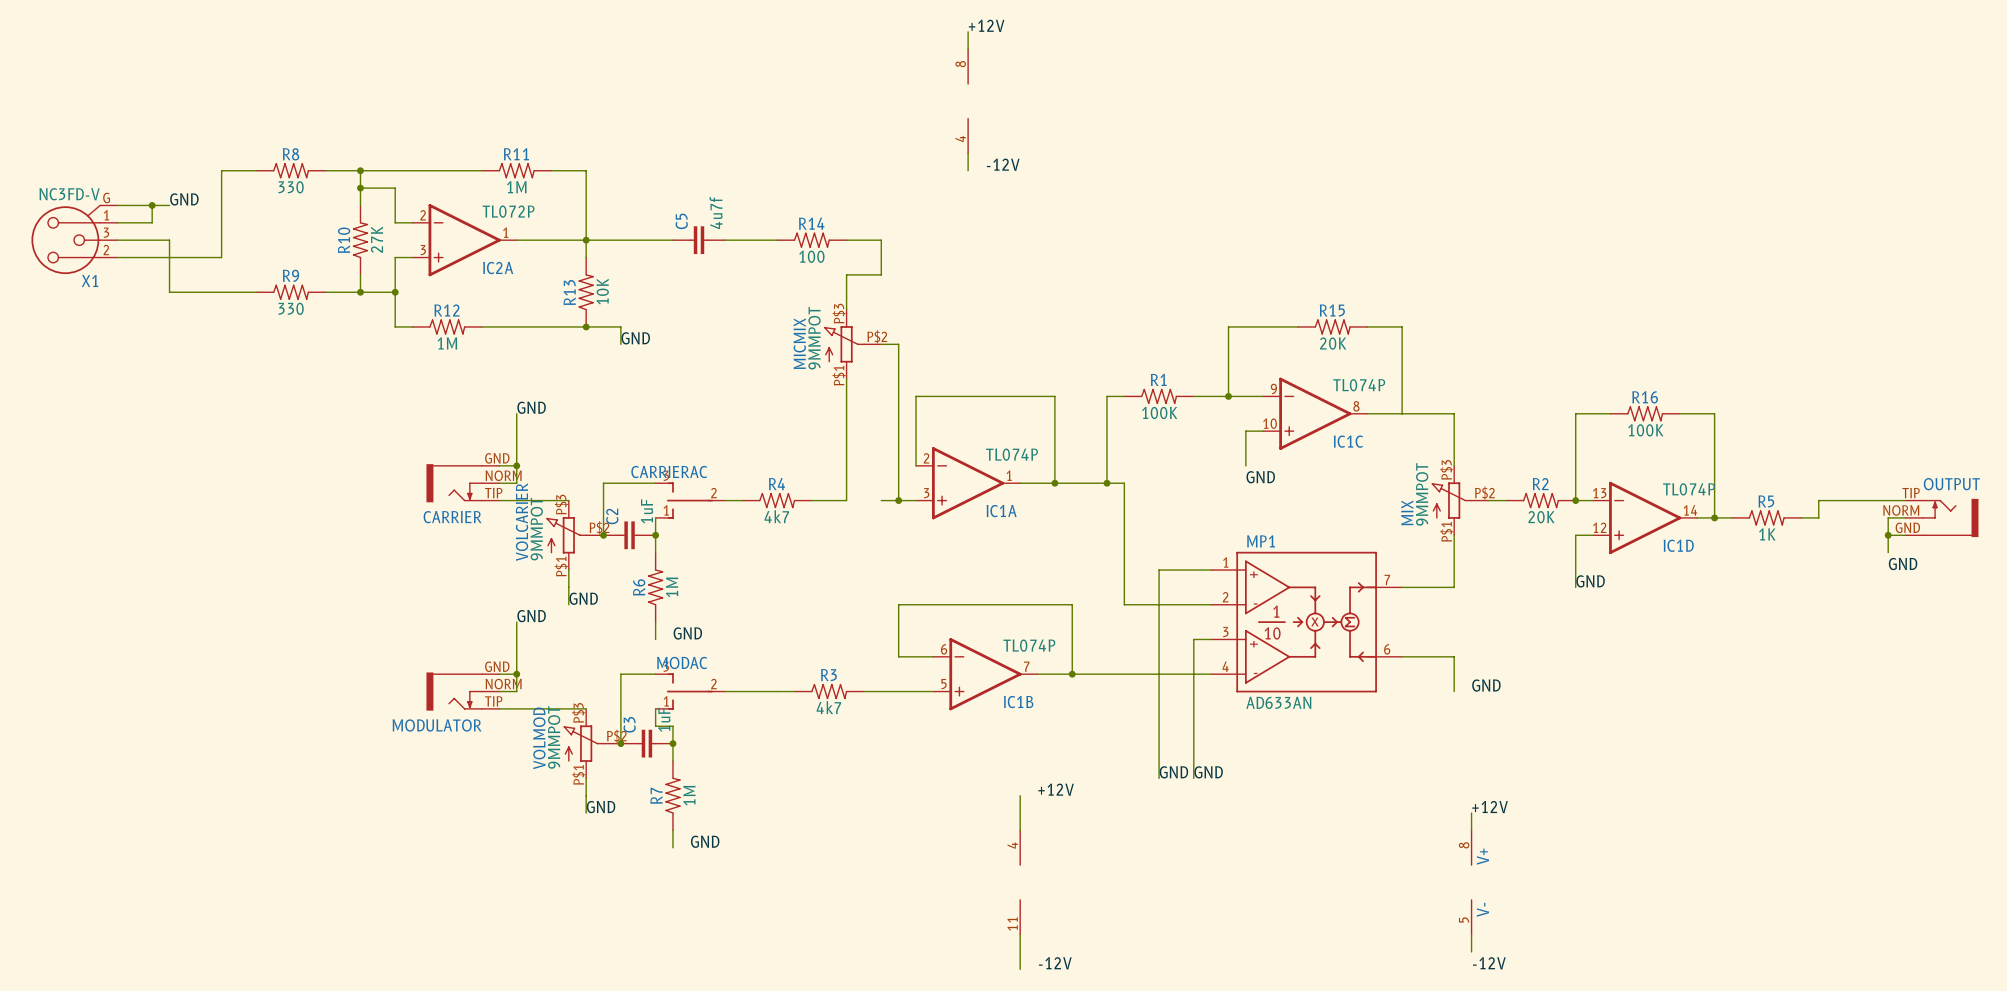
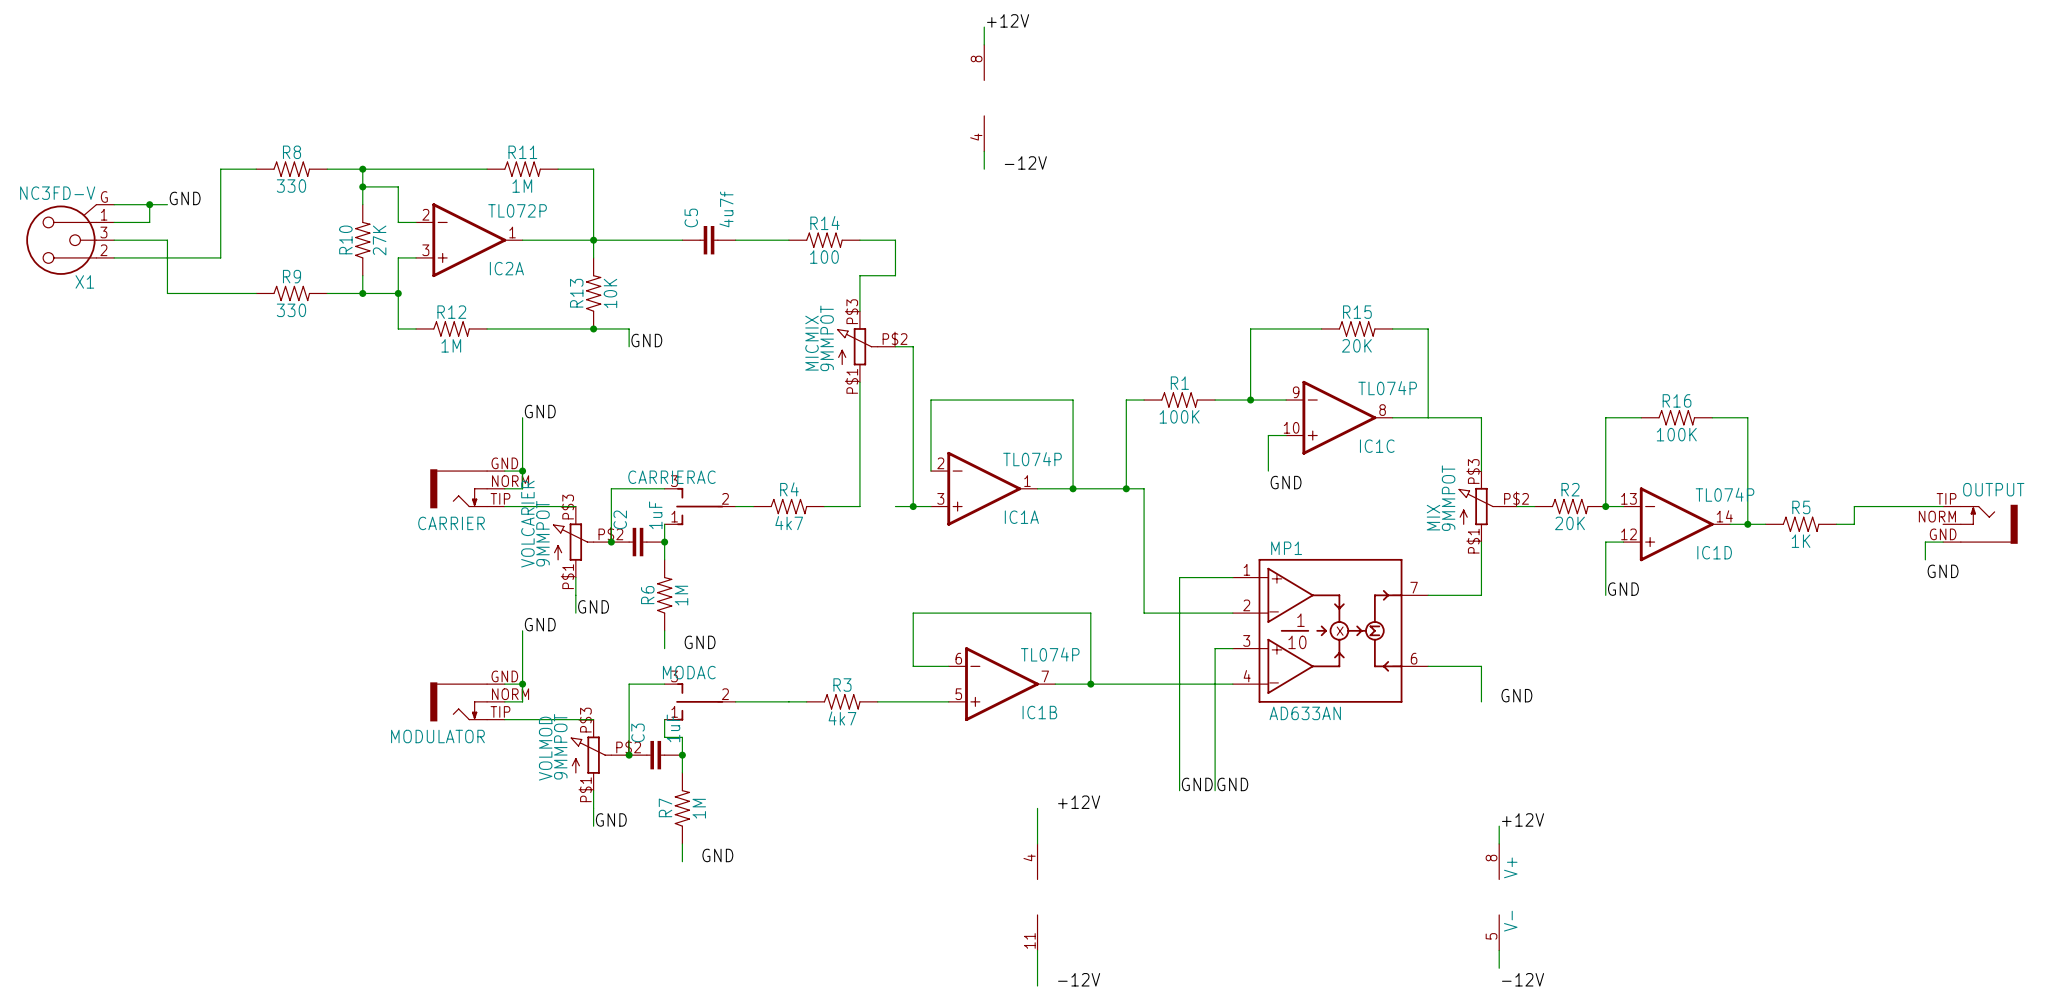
wire: (1905, 517) (1888, 517) (1888, 535) -> none
junction: (1888, 535) -> none

